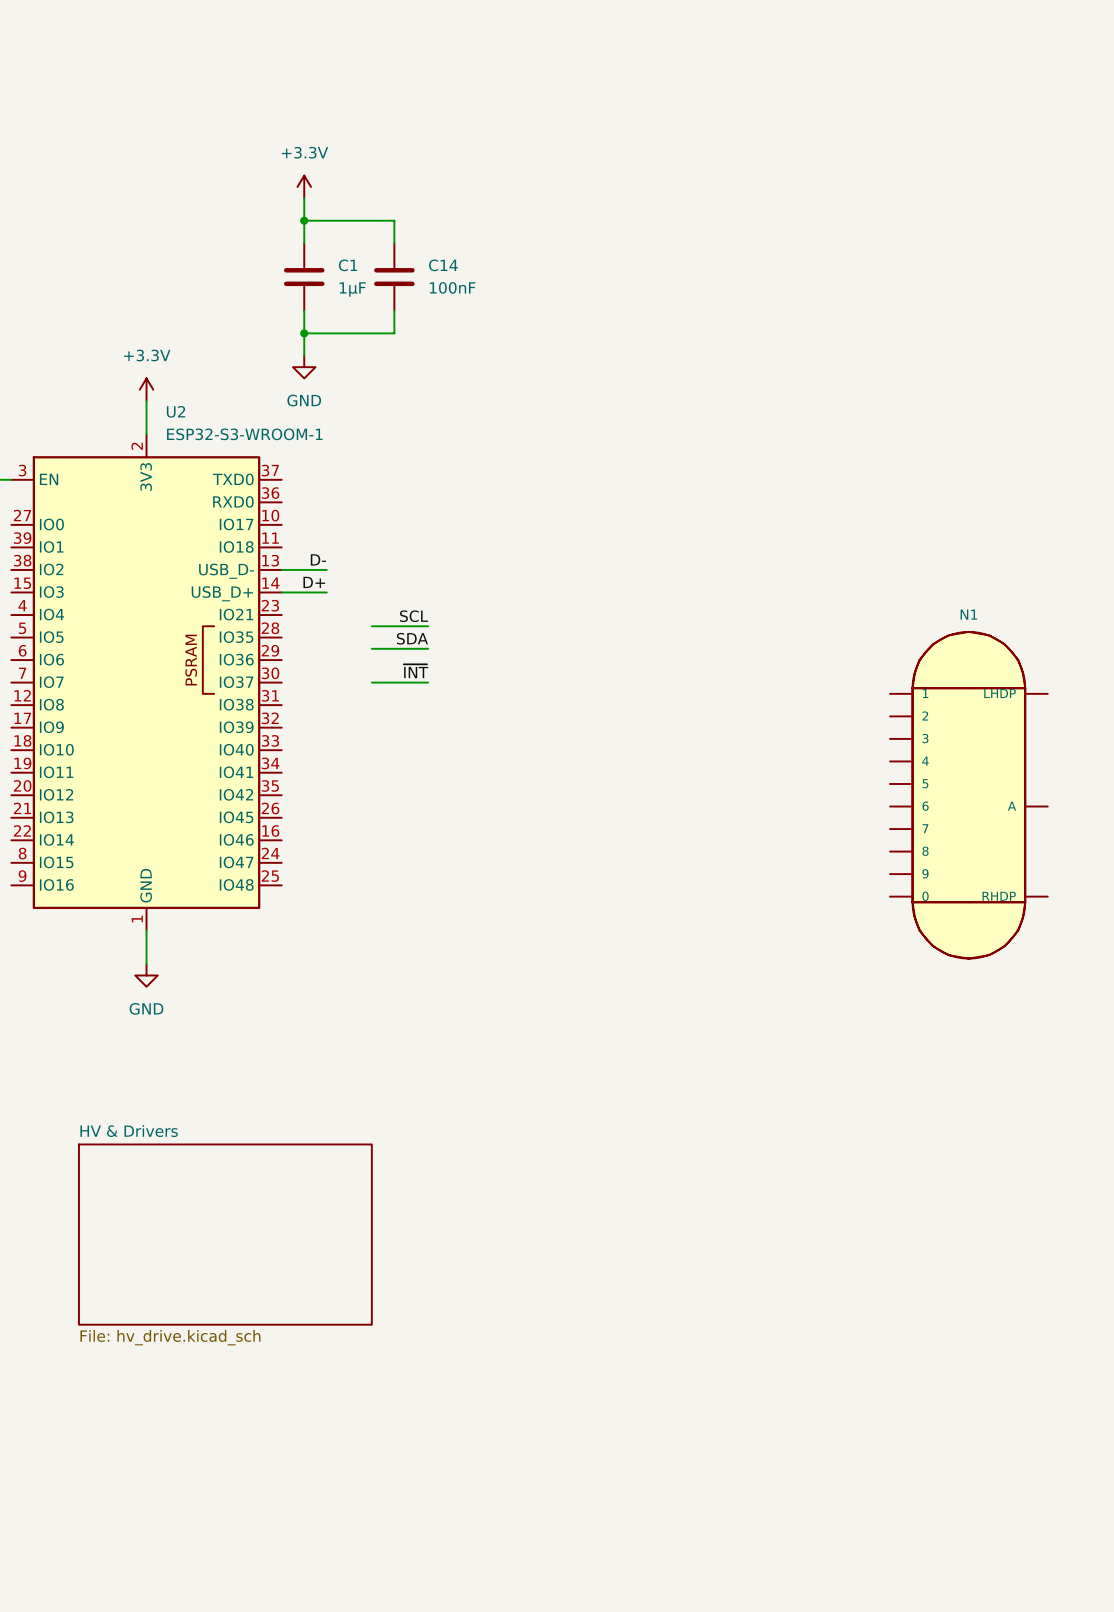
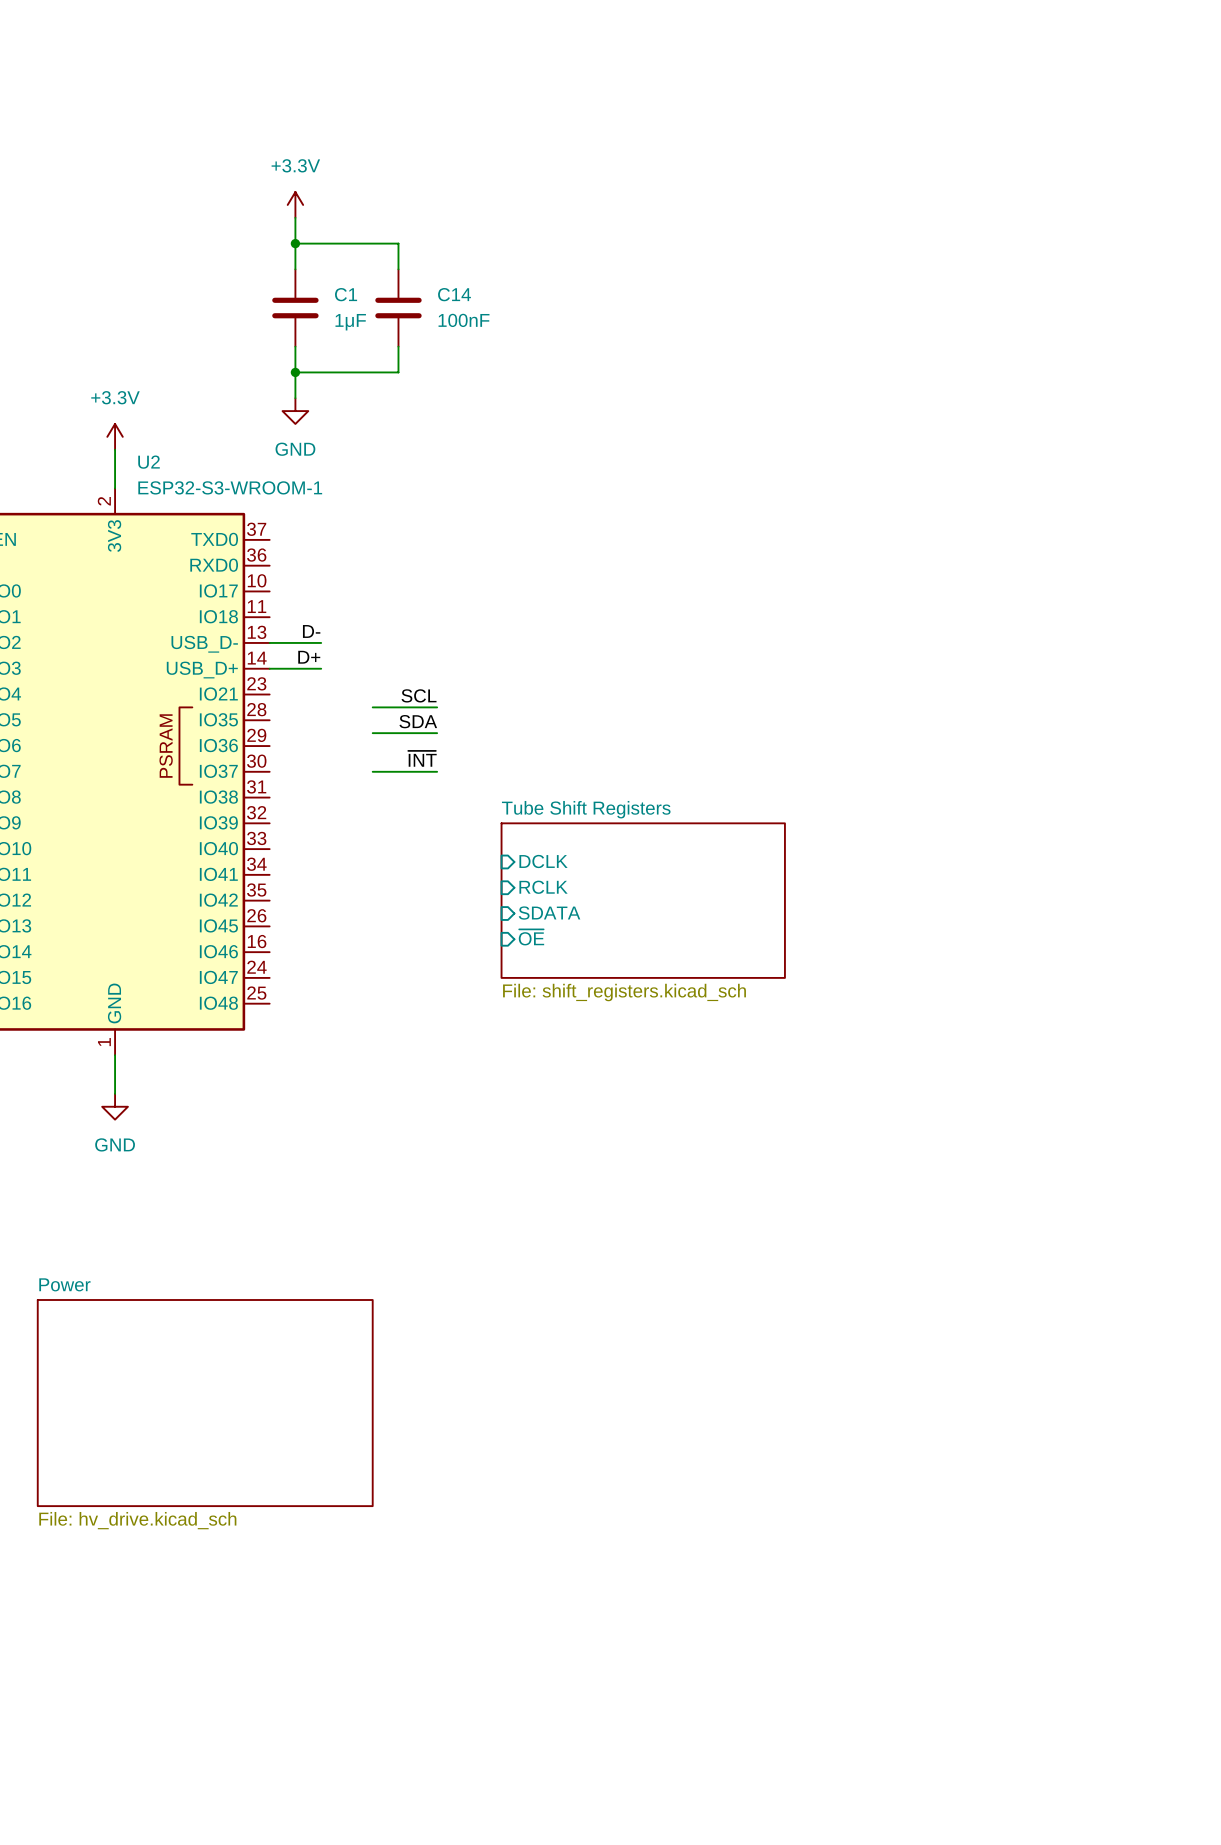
sheet pin: none -> DCLK (543, 861)
sheet pin: none -> RCLK (543, 887)
sheet Tube Shift Registers: none -> File: shift_registers.kicad_sch (643, 900)
N1: (968, 795) -> none
sheet pin: none -> SDATA (549, 913)
sheet pin: none -> ~{OE} (531, 937)
sheet HV & Drivers name: HV & Drivers (129, 1131) -> Power (64, 1284)

